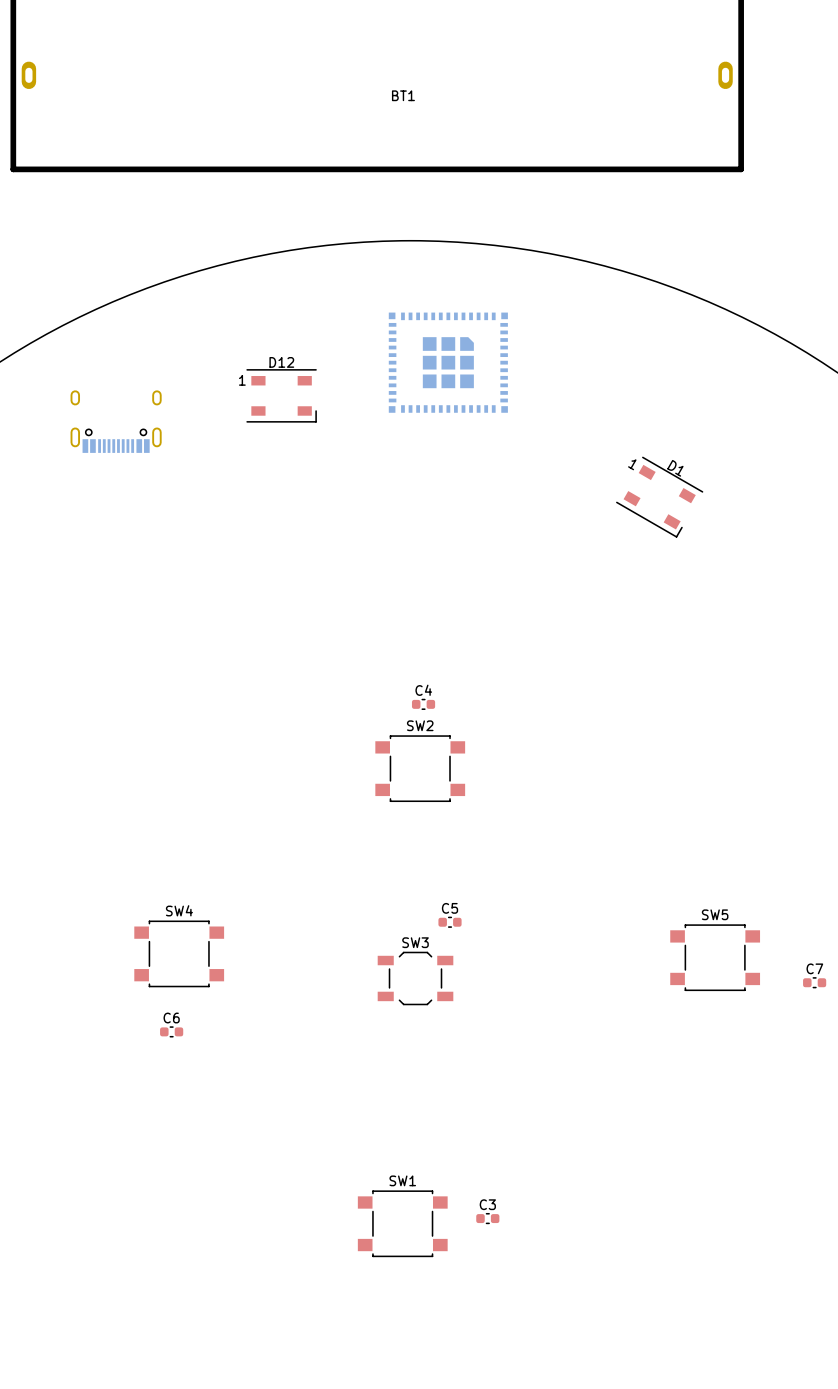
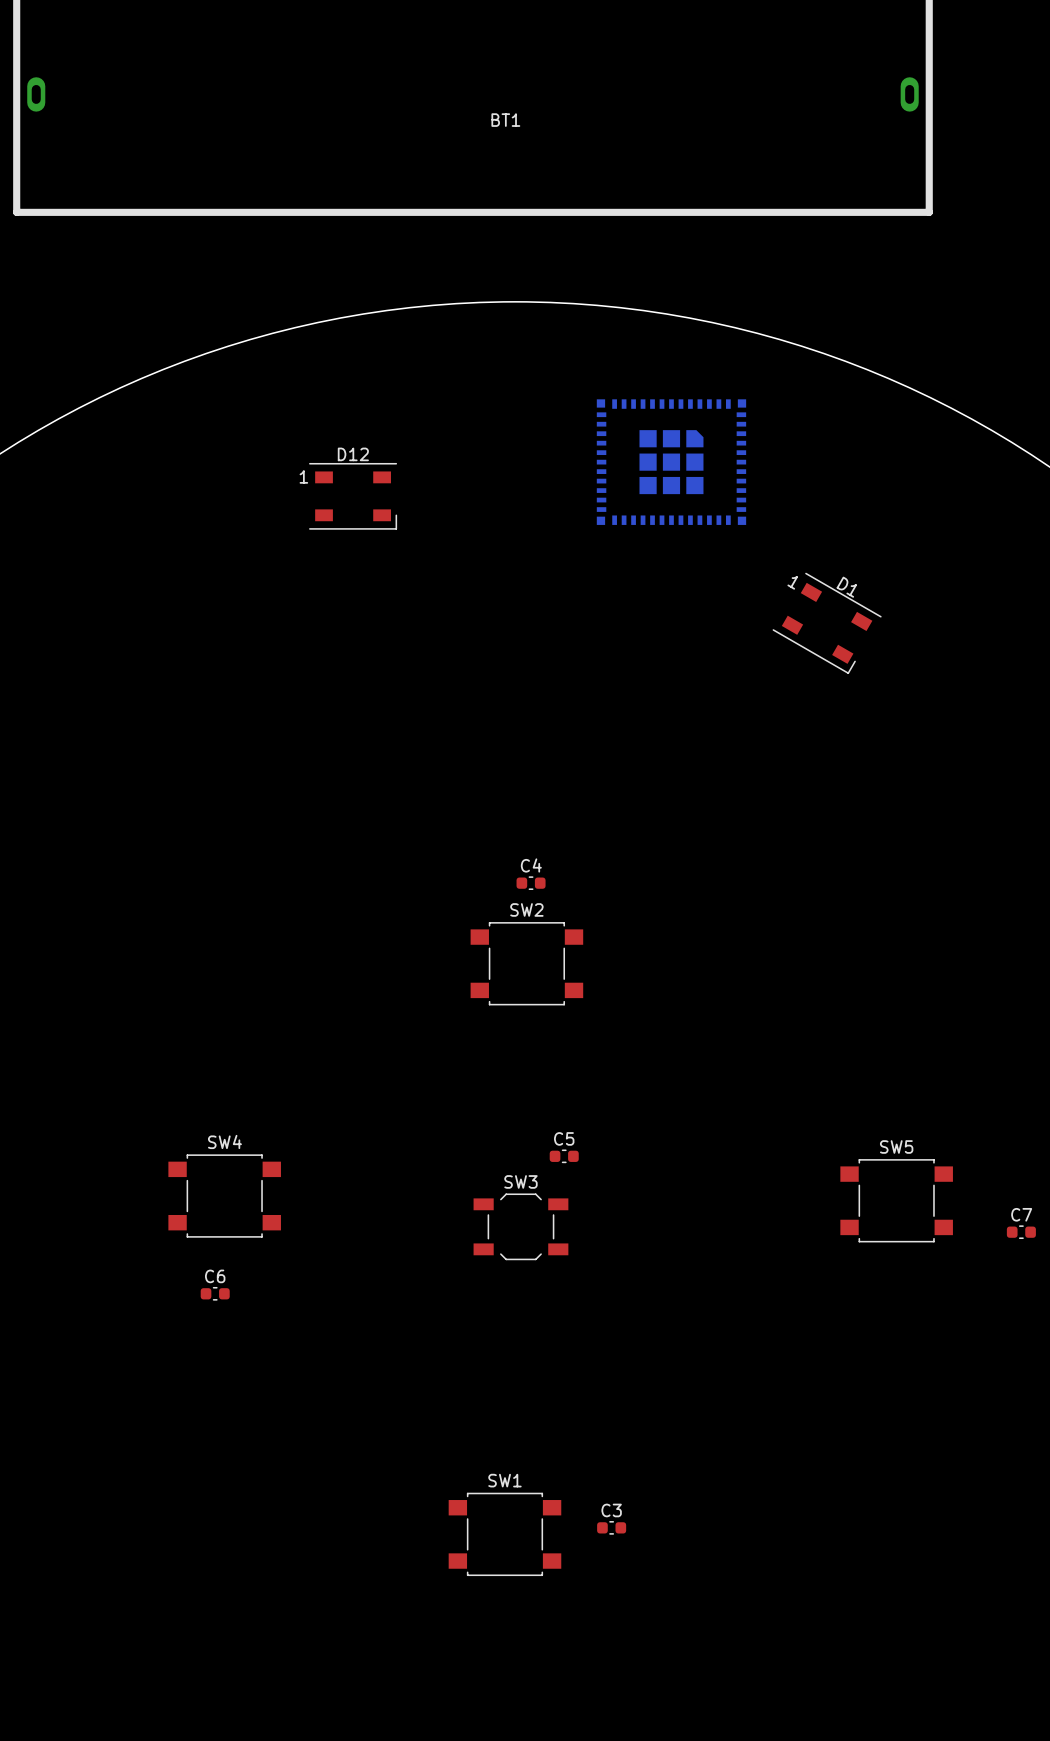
part position: (448, 362) -> (671, 462)
part: (116, 421) -> none

